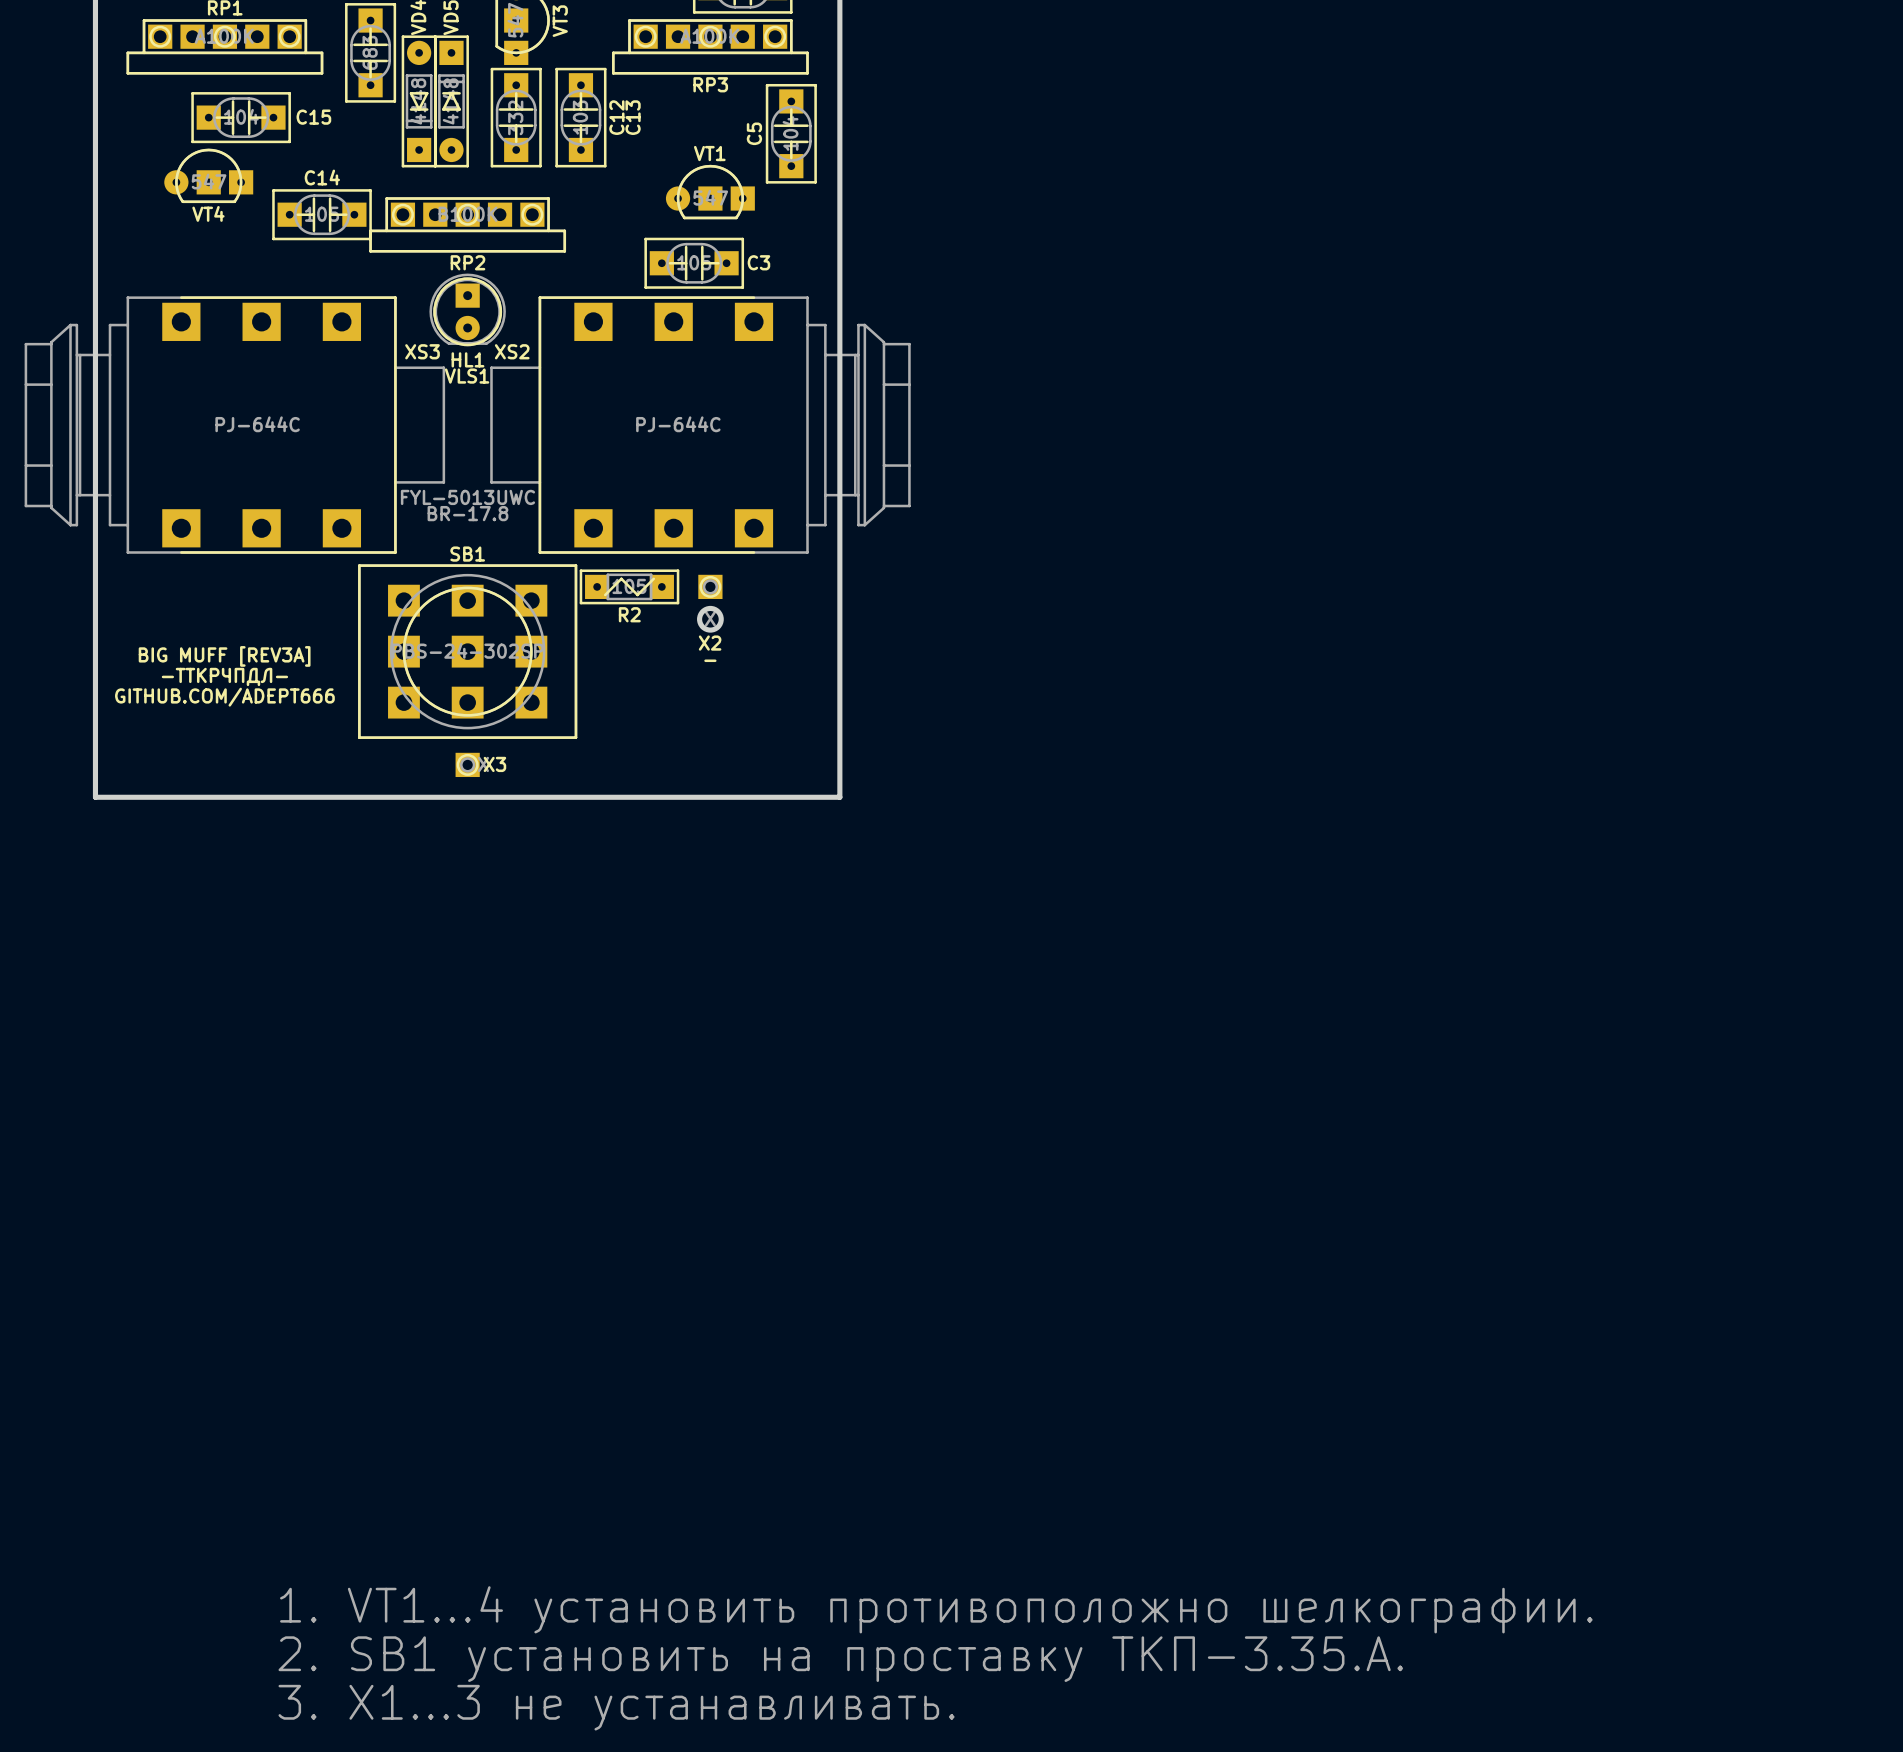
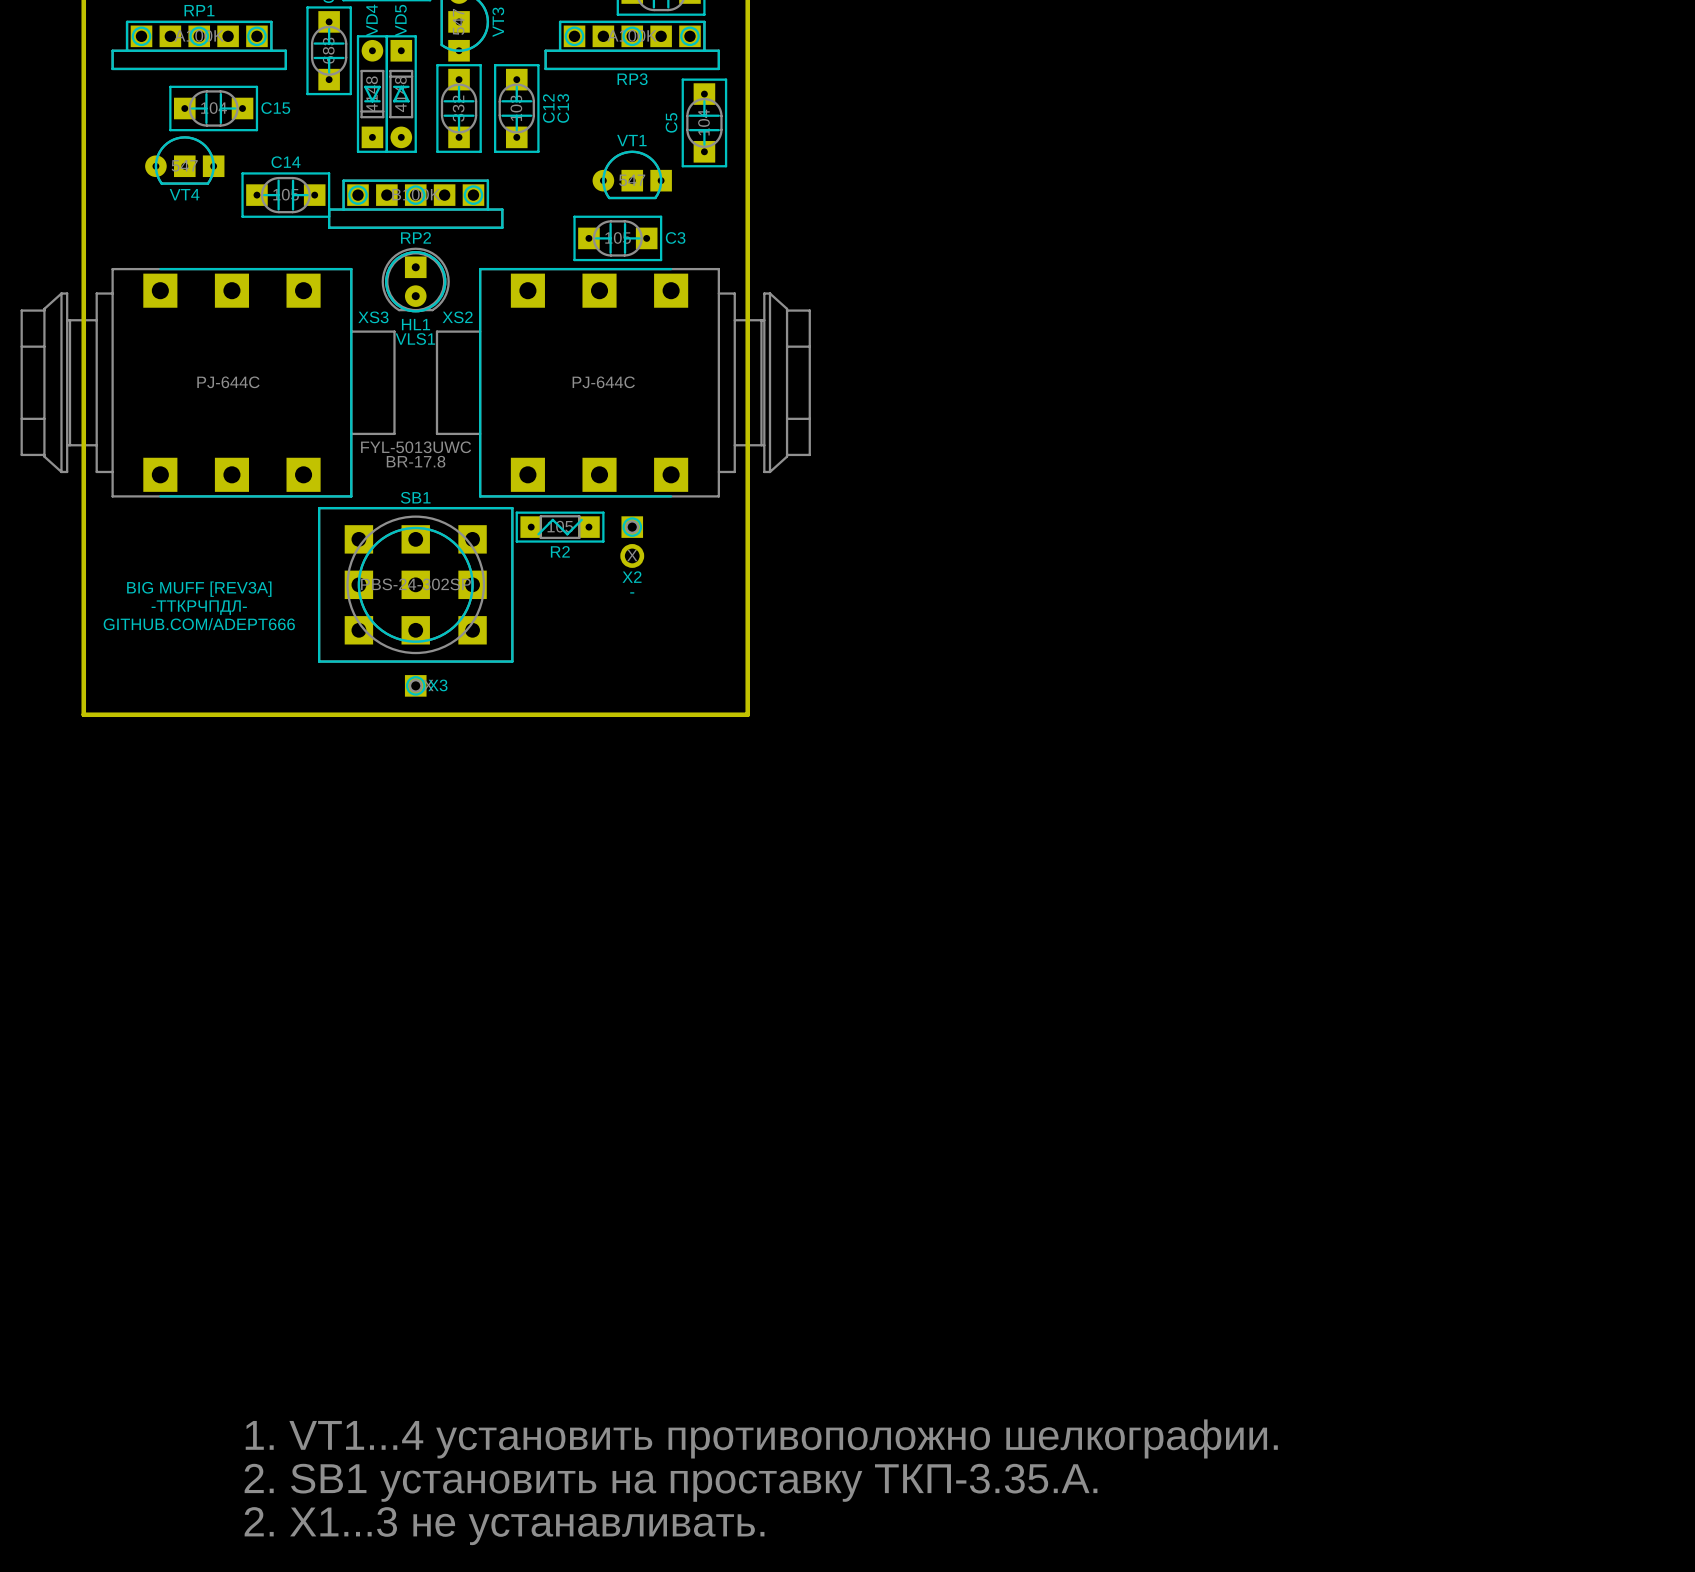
text: 3. X1...3 не устанавливать. (616, 1707) -> 2. X1...3 не устанавливать. (504, 1526)

